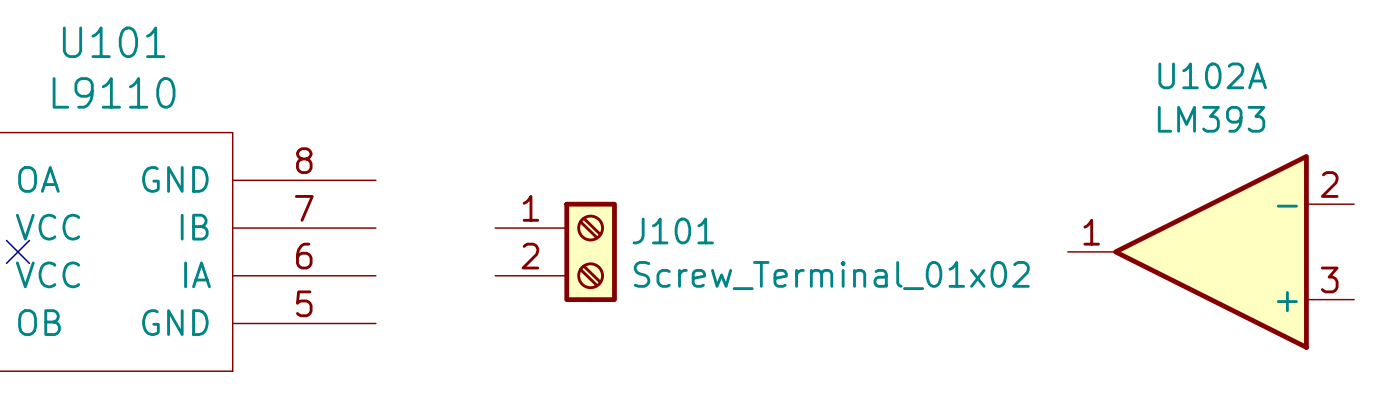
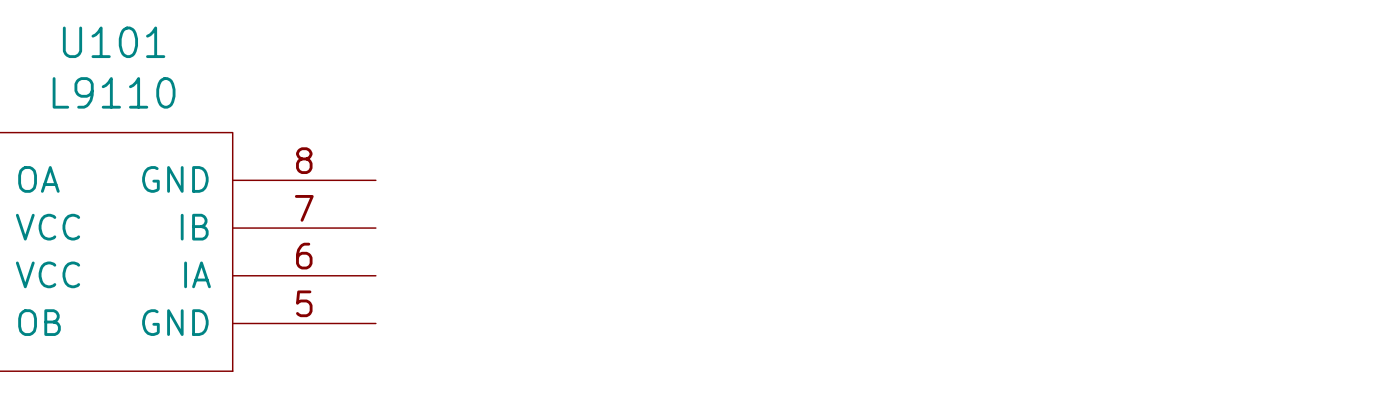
no-connect mark: (17, 251) -> none
J101: Screw_Terminal_01x02 (556, 251) -> none
U102A: LM393 (1210, 251) -> none

